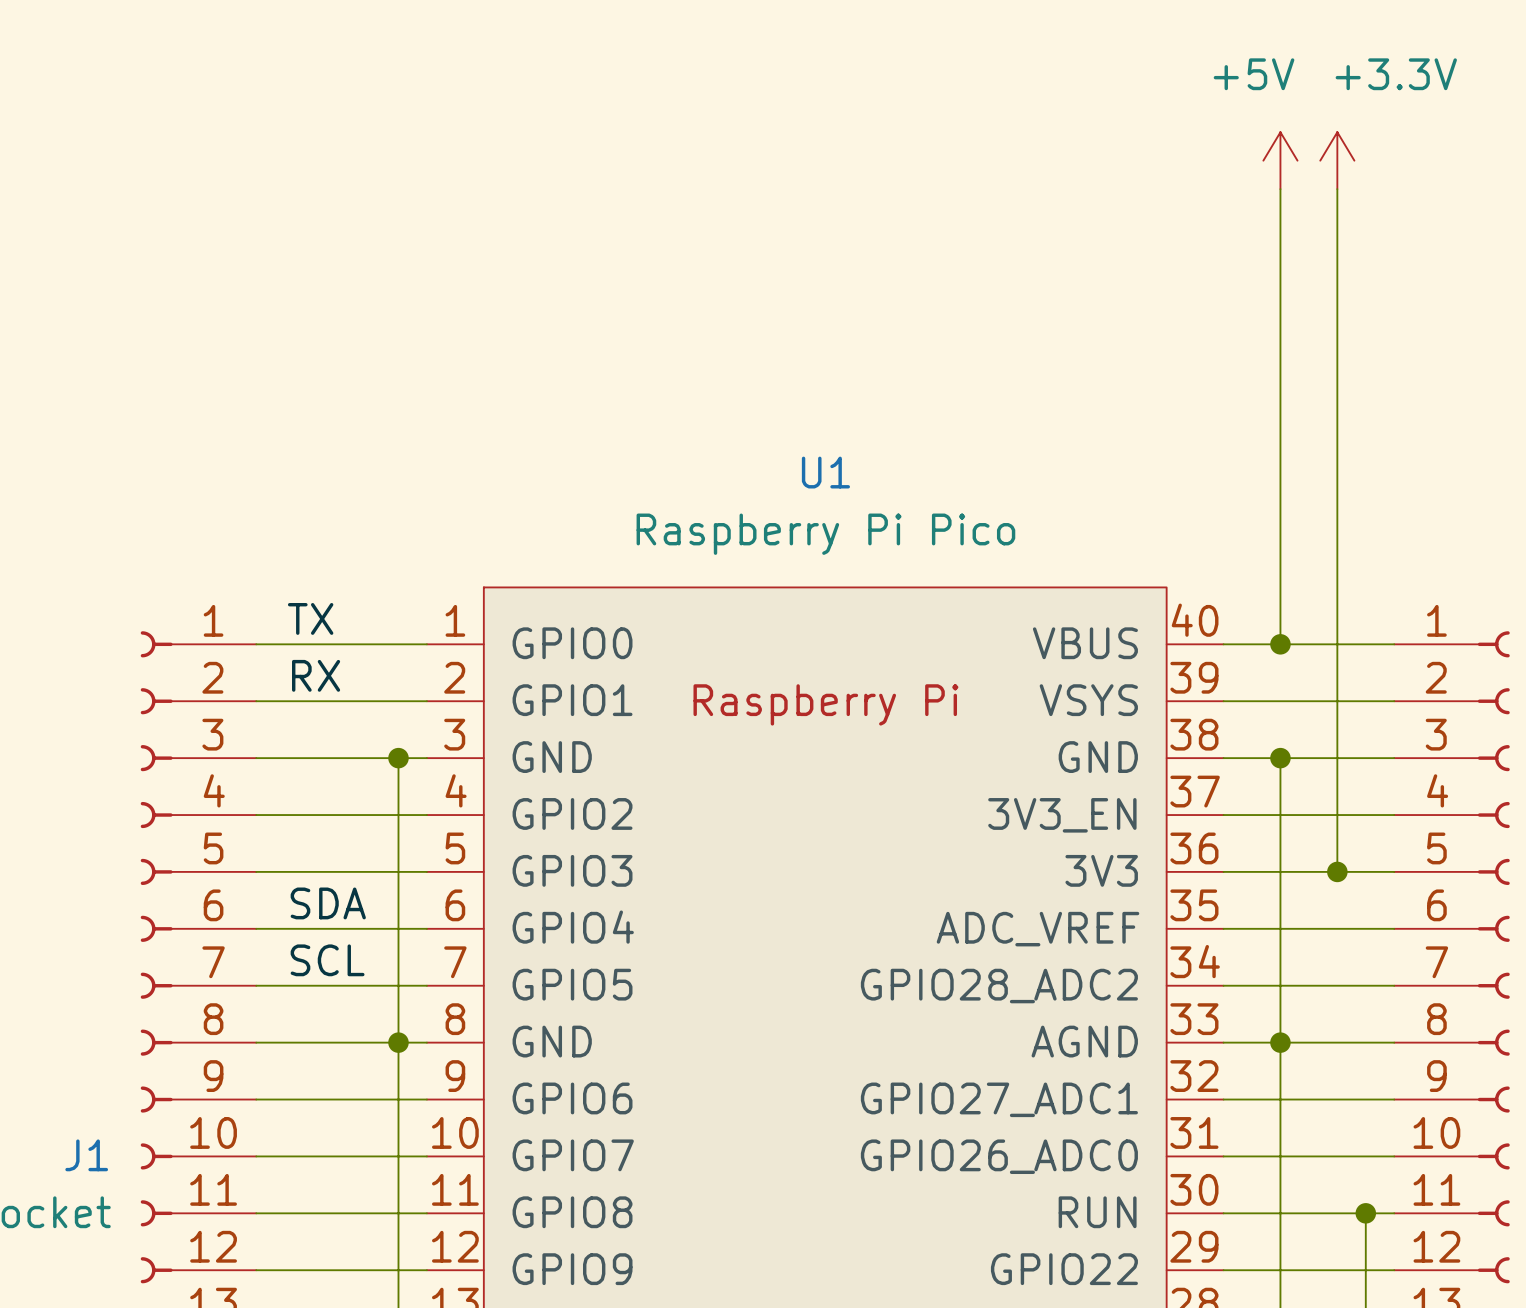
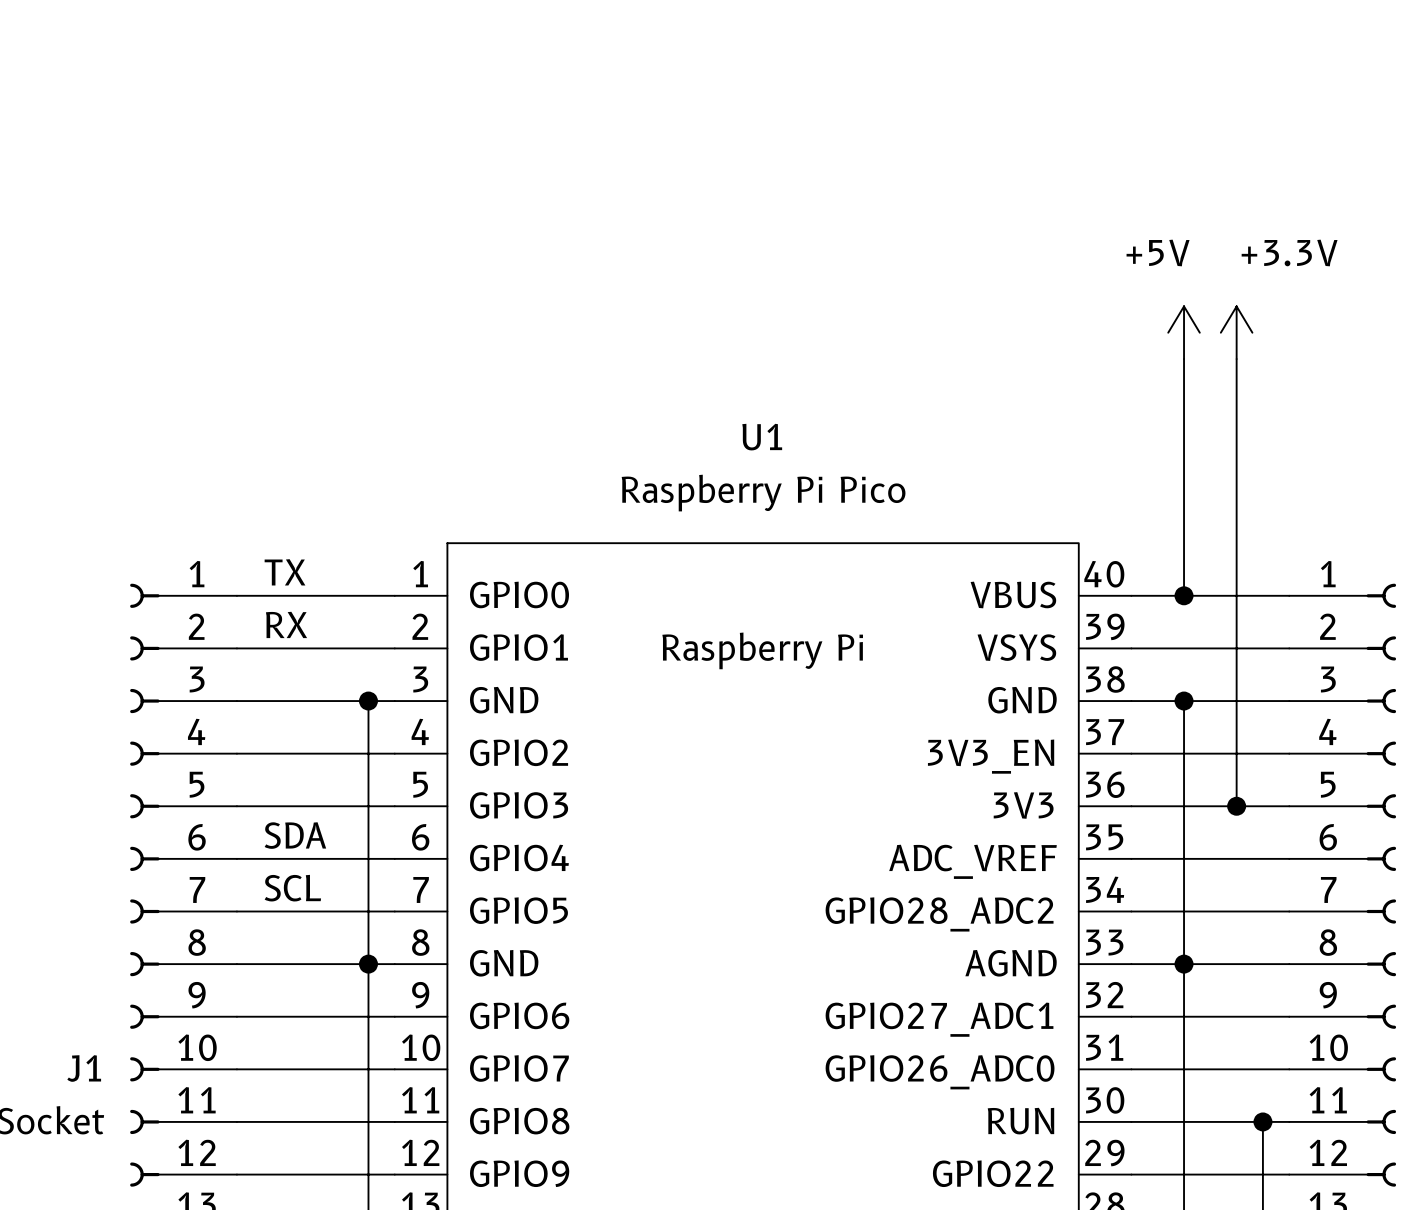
power symbol position: +5V (1280, 160) -> +5V (1184, 332)
power symbol position: +3.3V (1337, 160) -> +3.3V (1236, 332)
wire: (1280, 189) (1280, 388) -> none
wire: (1337, 189) (1337, 388) -> none

